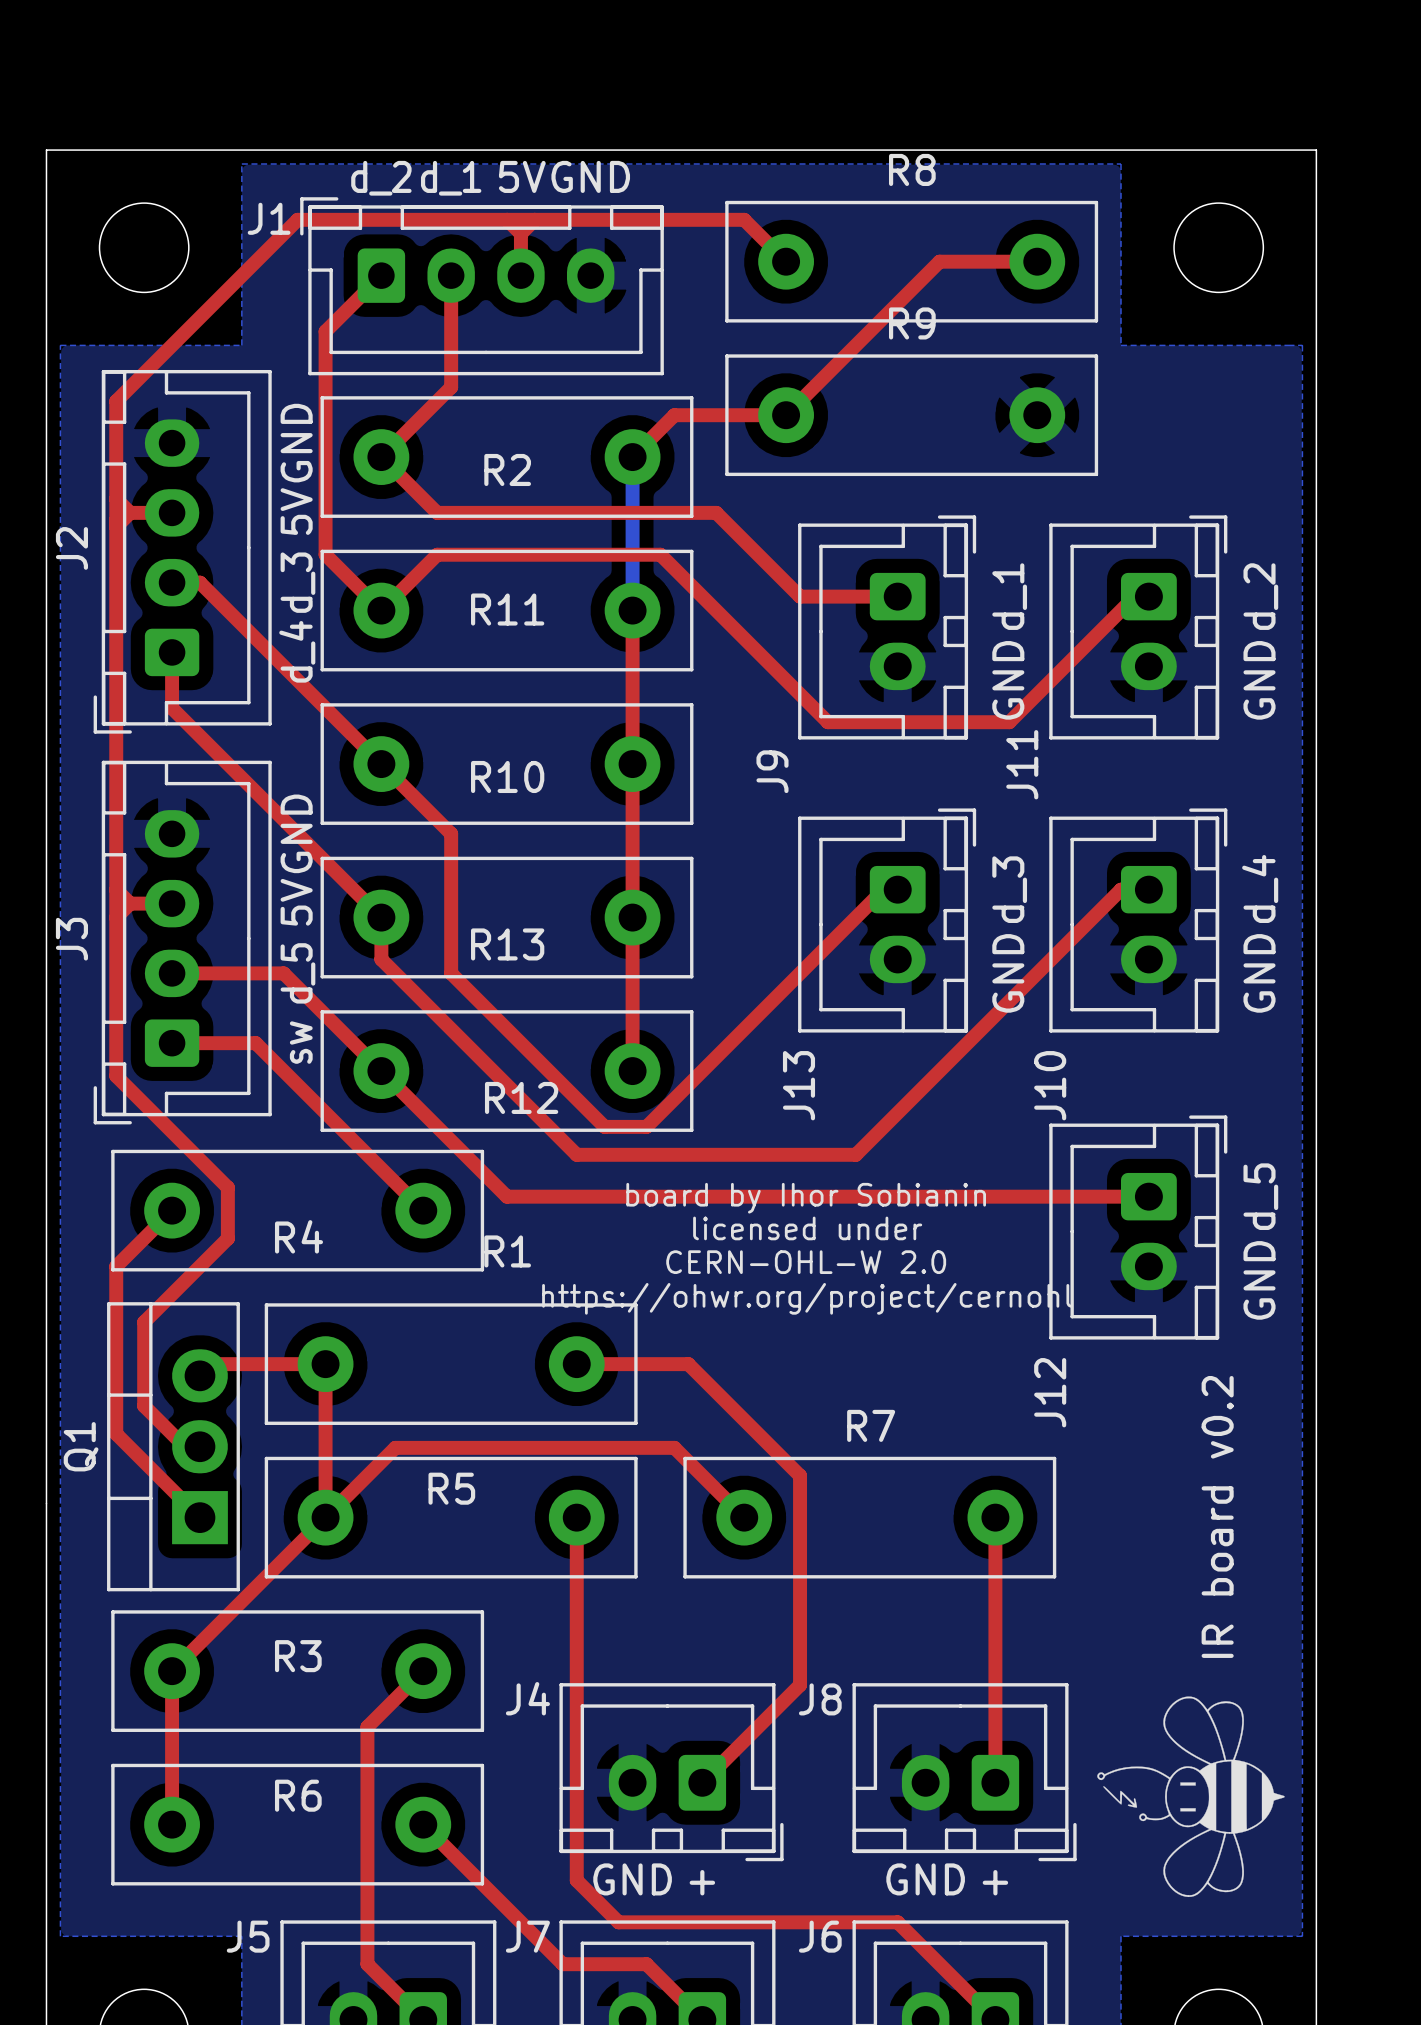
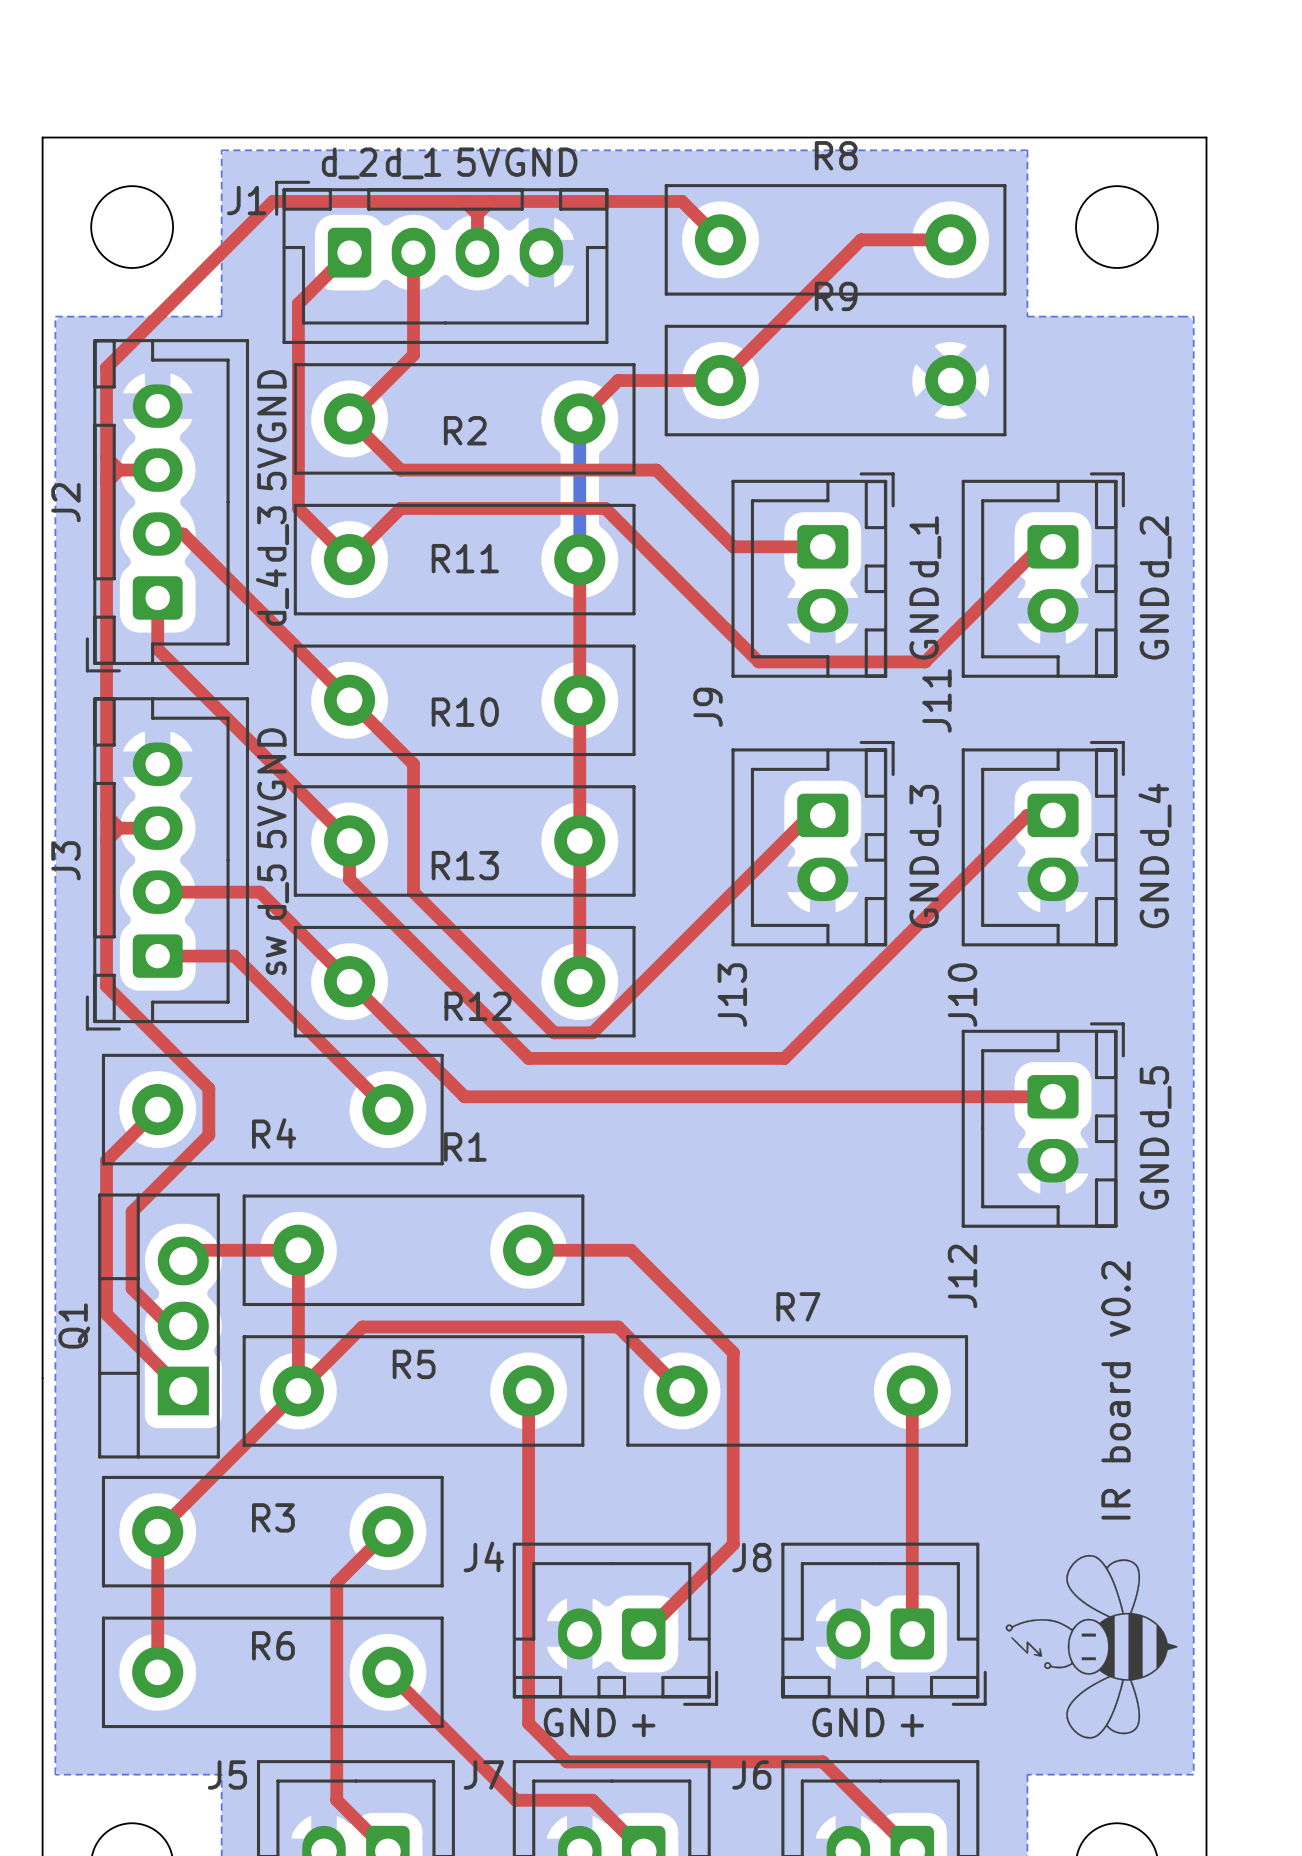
text: board by Ihor Sobianin (806, 1198) -> none
text: licensed under (807, 1228) -> none
text: CERN-OHL-W 2.0 (806, 1262) -> none
text: https://ohwr.org/project/cernohl (807, 1298) -> none

